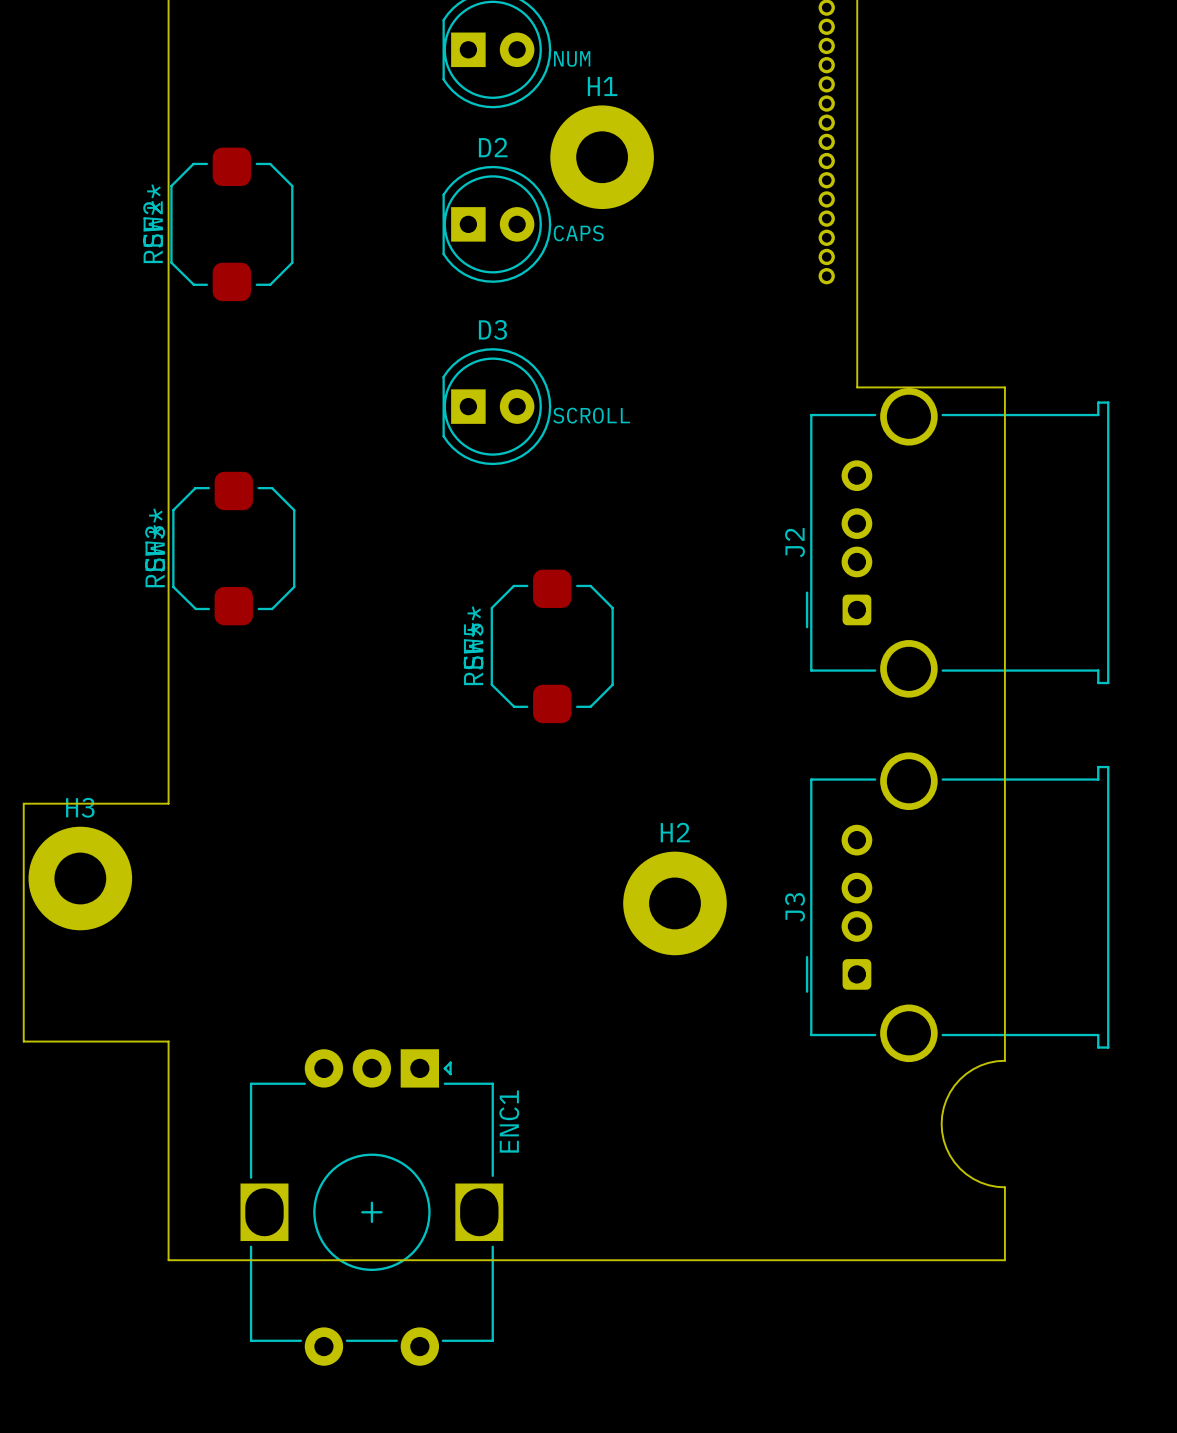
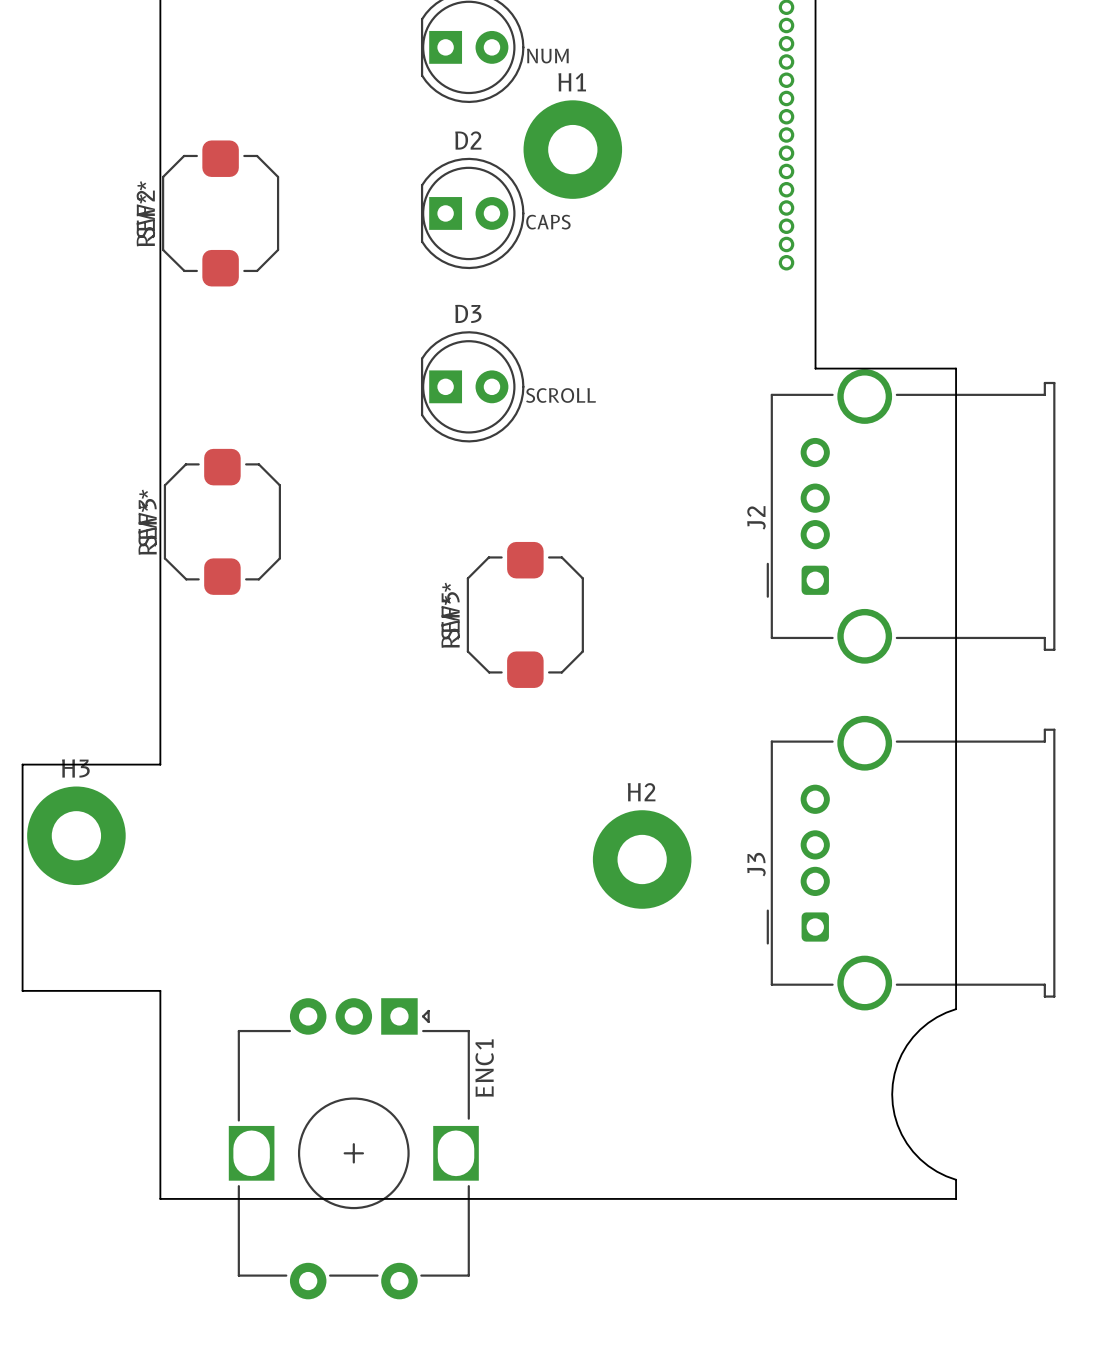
board edge: (1004, 1060) (980, 1065) (960, 1079) (946, 1099) (941, 1124) (946, 1148) (960, 1168) (980, 1182) (1004, 1187) (1004, 1240) -> (956, 1009) (928, 1022) (906, 1045) (894, 1073) (892, 1094) (897, 1125) (913, 1151) (928, 1165) (956, 1179)

